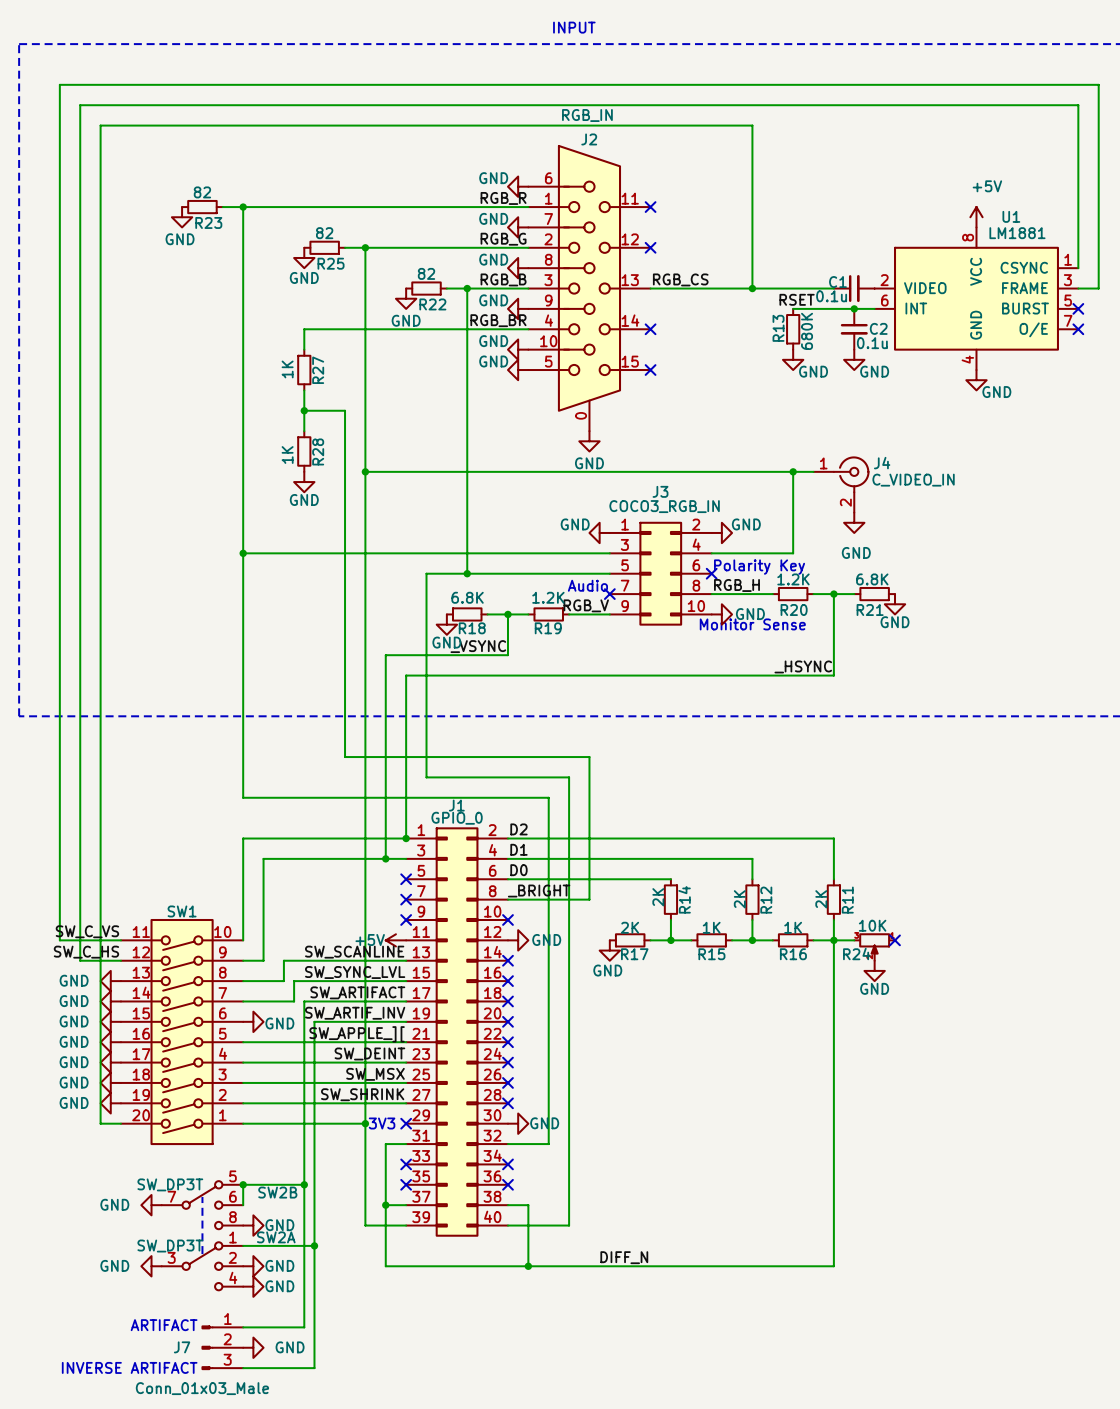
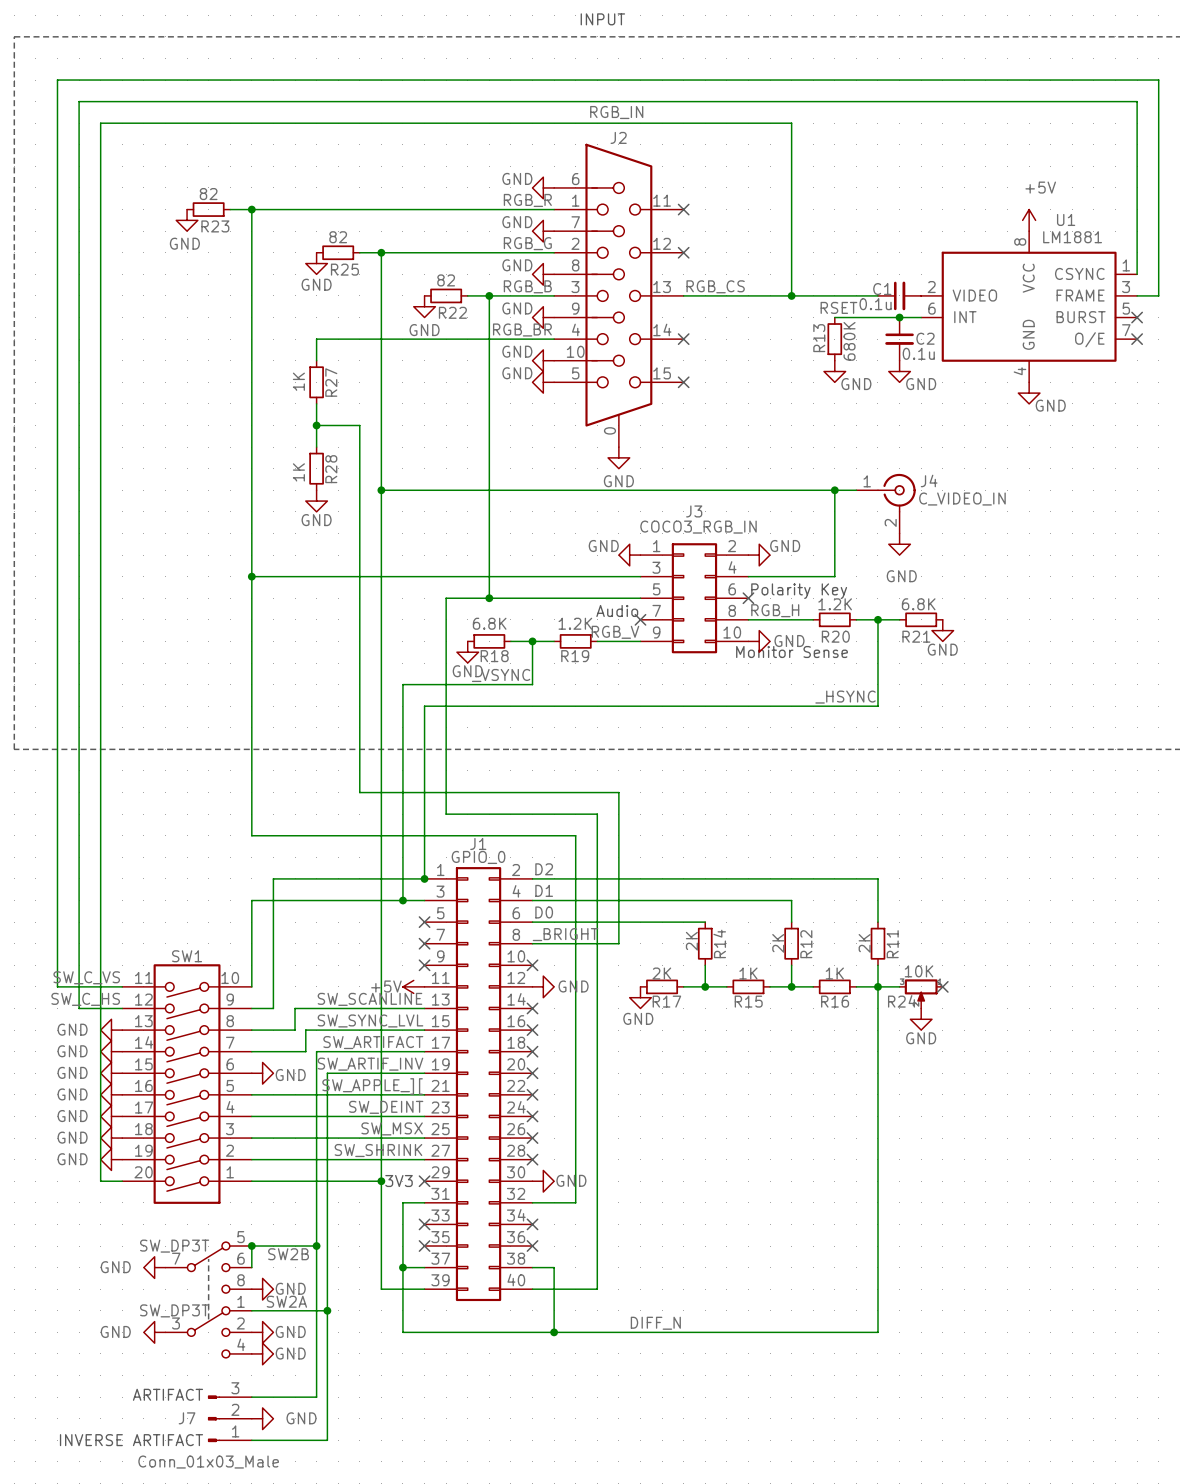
wire: (263, 838) (243, 838) (243, 858) -> (273, 878) (273, 900) (251, 900)
J7 flip: as is (207, 1347) -> up-down (214, 1418)

